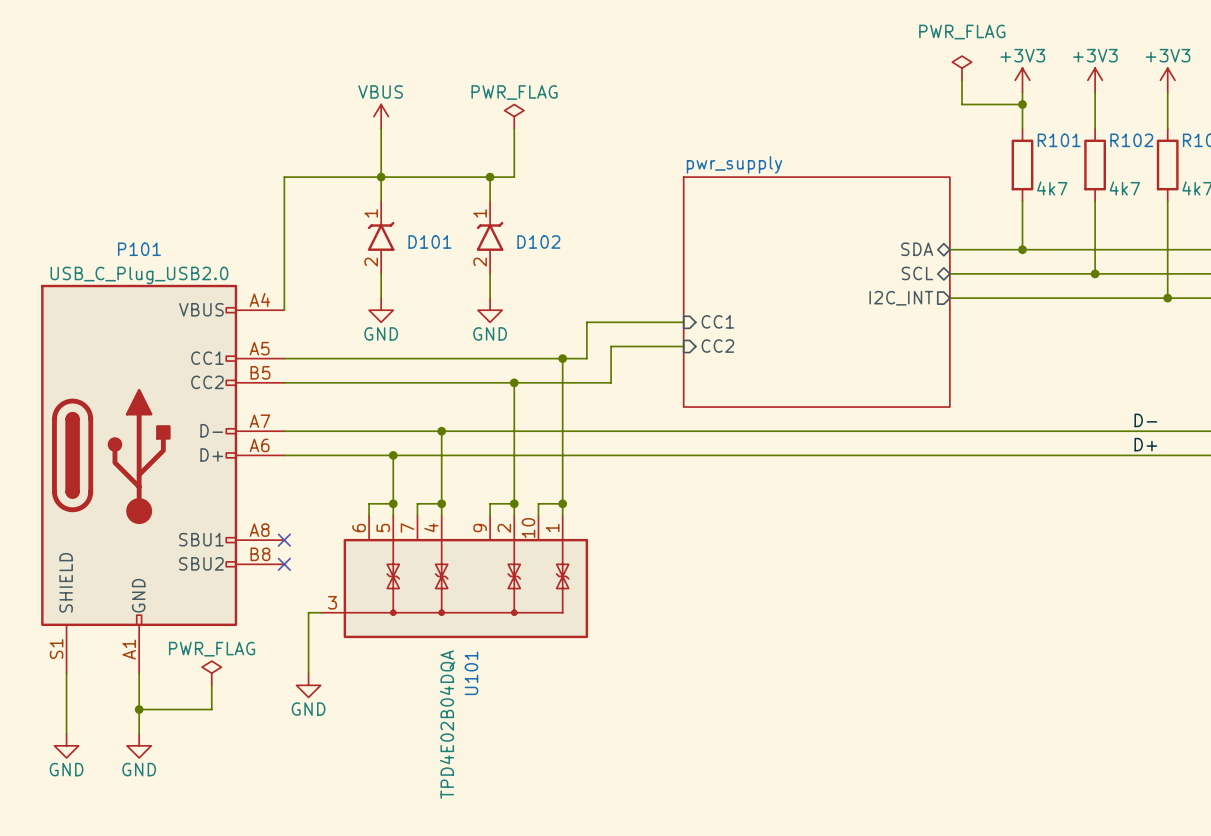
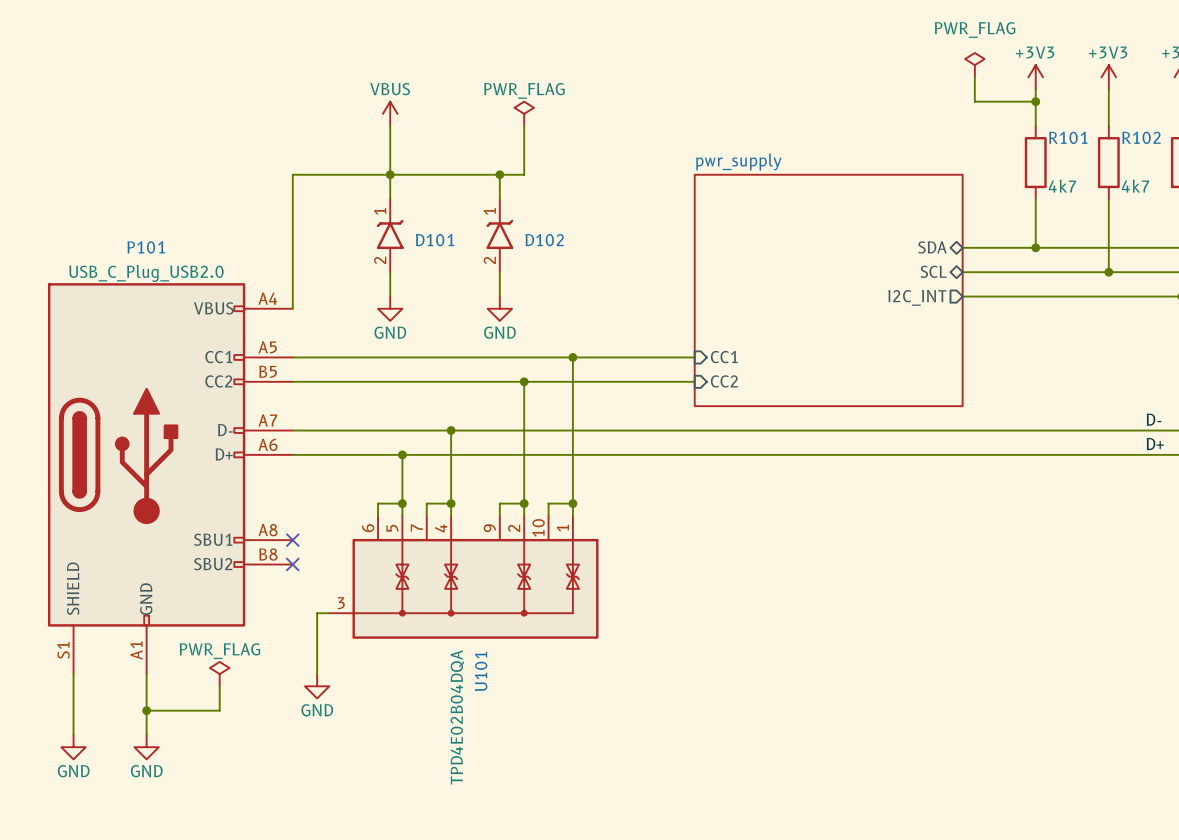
sheet pin position: CC1 (717, 321) -> CC1 (724, 357)
wire: (683, 322) (586, 322) (586, 358) -> (694, 357) (597, 357)
wire: (683, 346) (611, 346) (611, 382) -> (694, 381) (621, 381)
sheet pin position: CC2 (717, 346) -> CC2 (724, 381)

